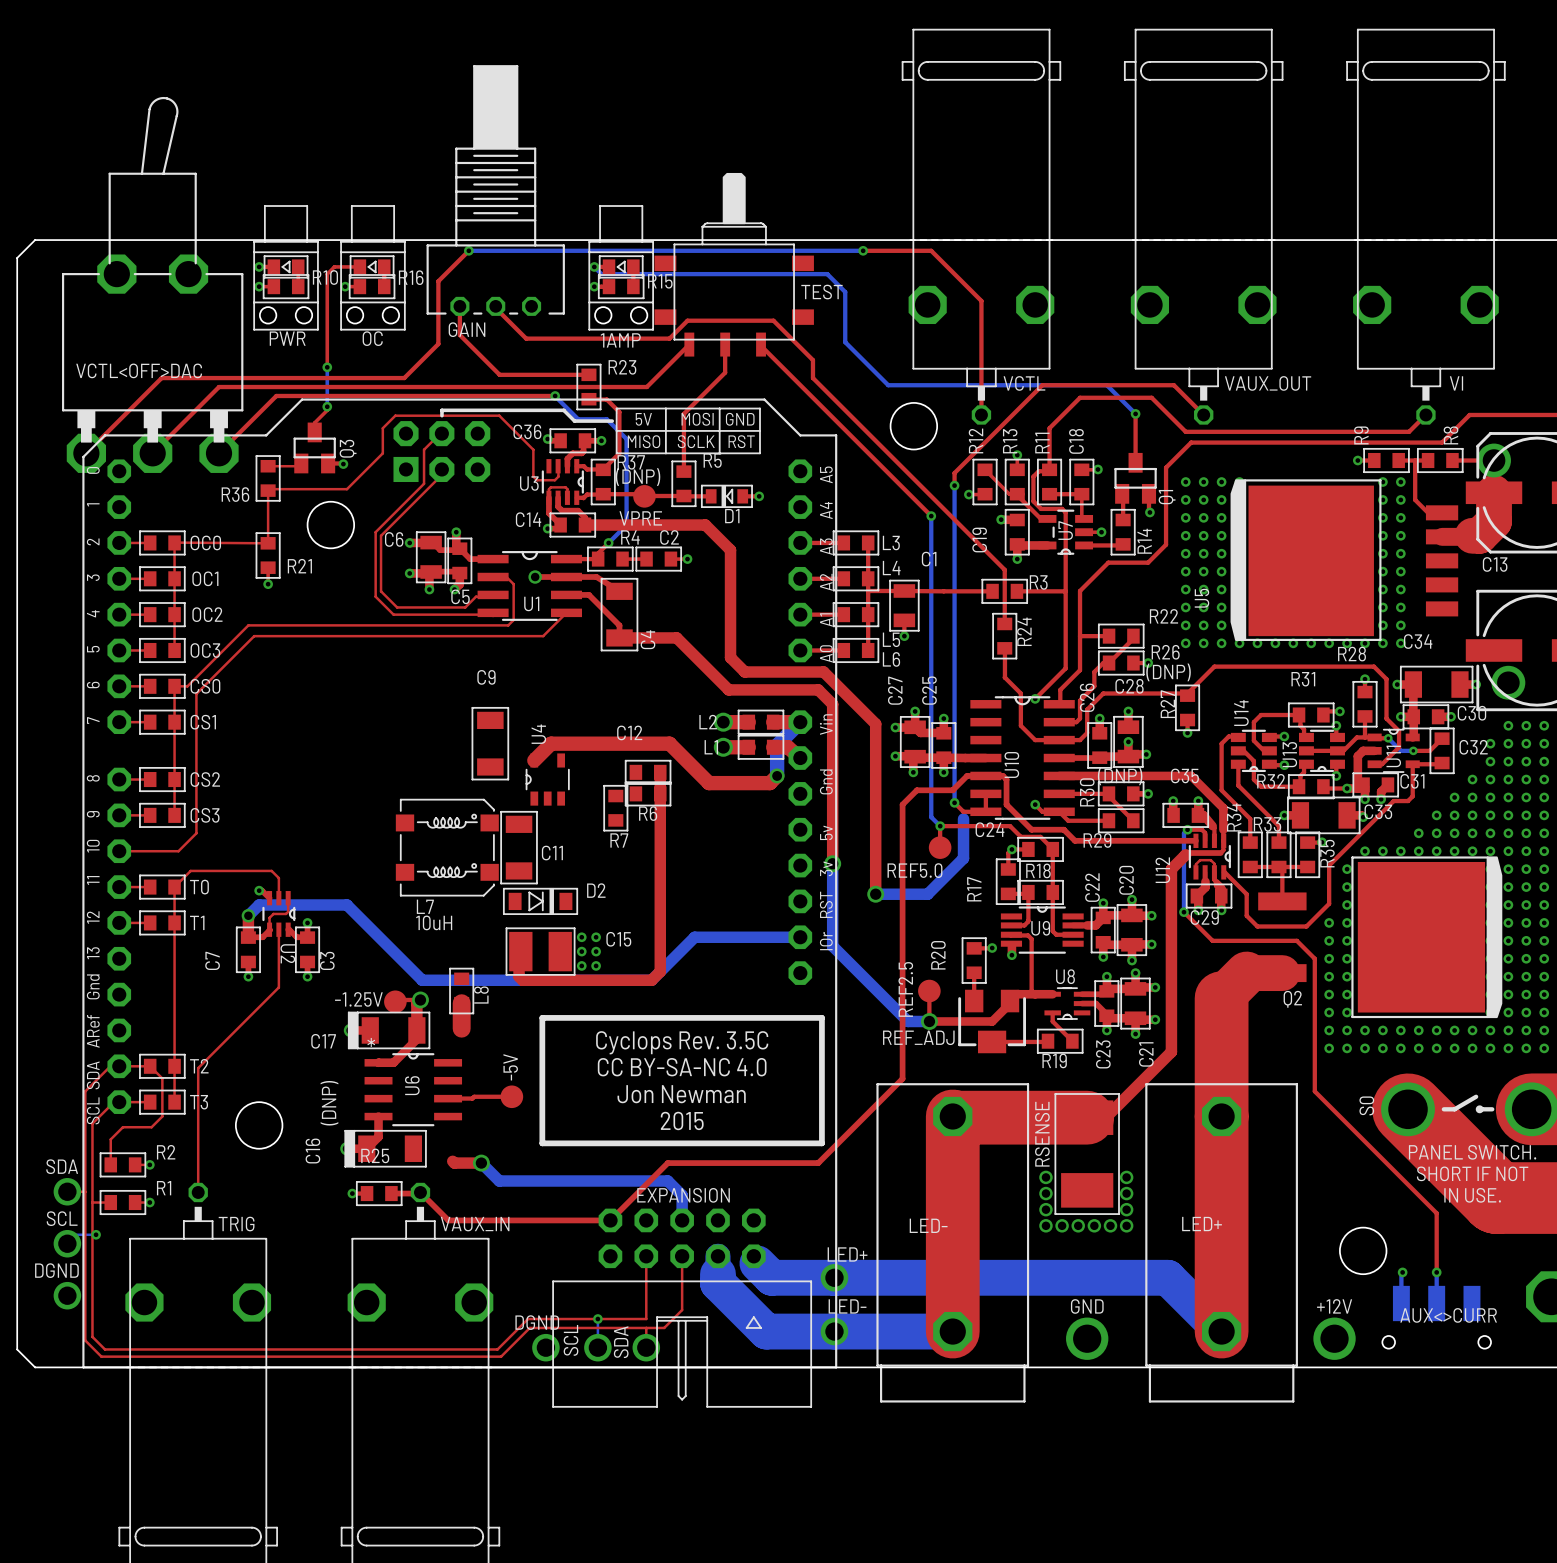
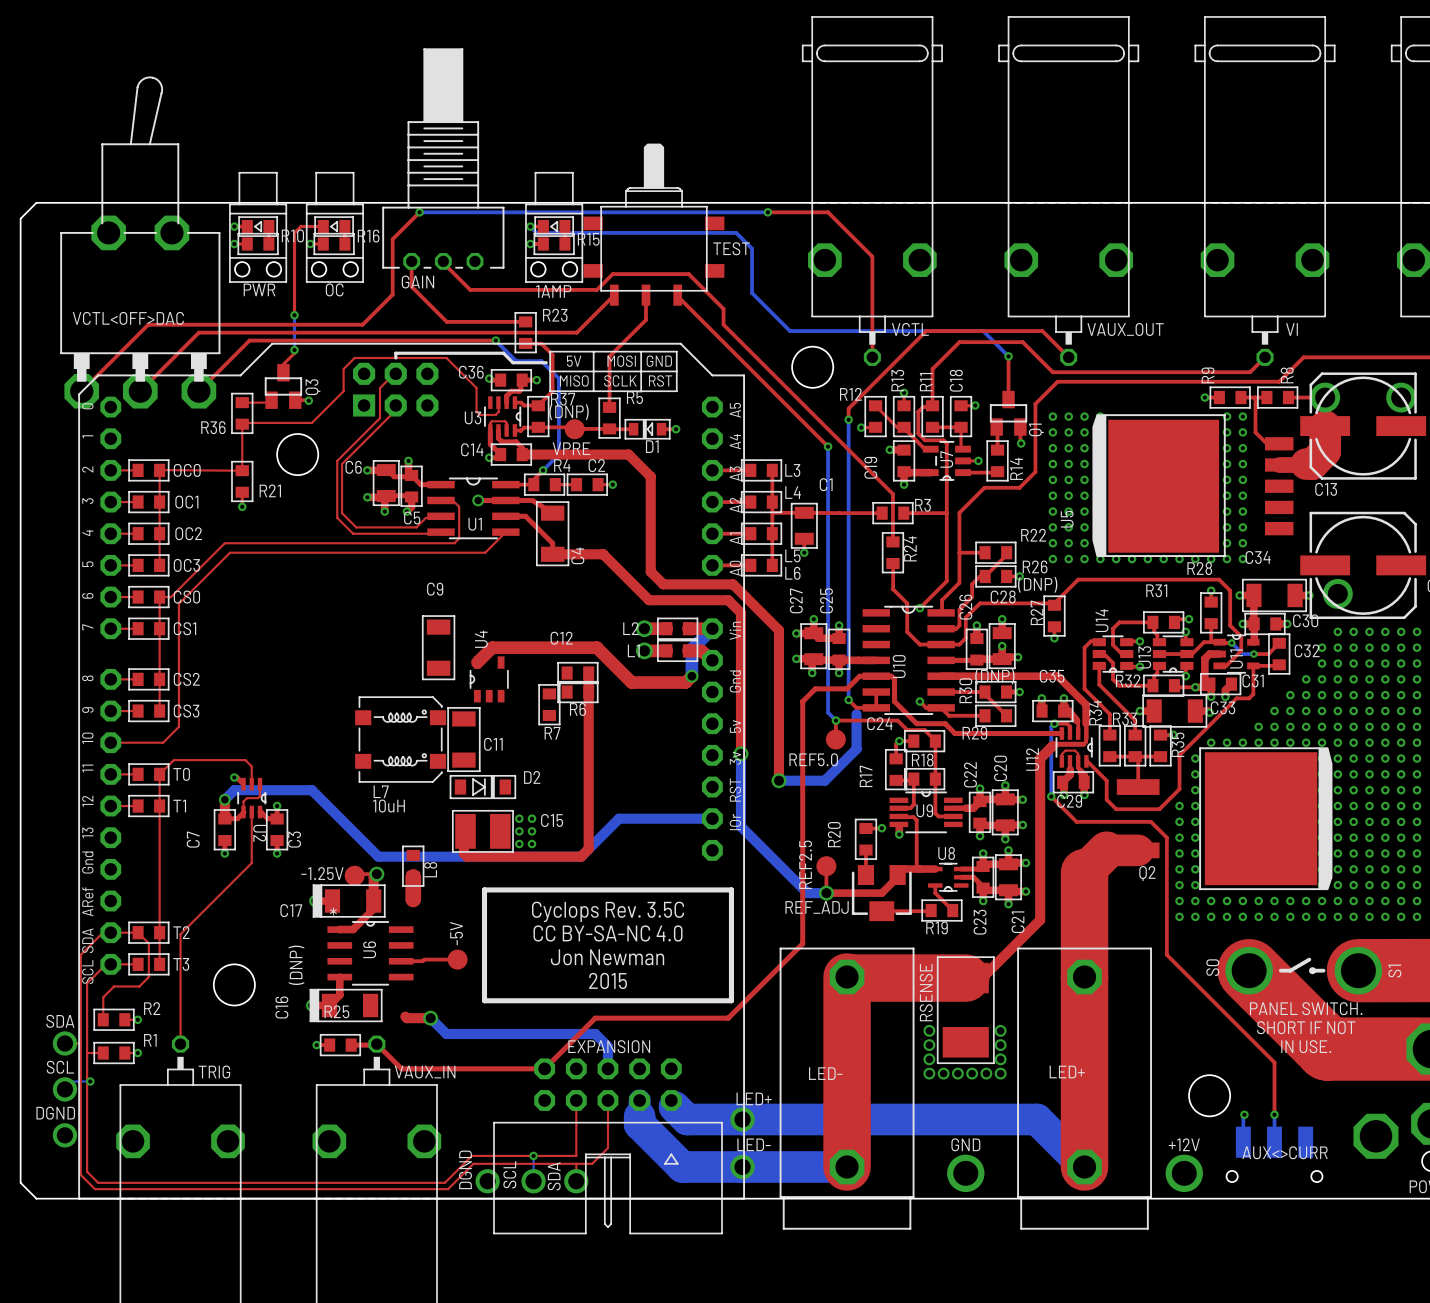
R12 name rotation: 0° (975, 440) -> 90° clockwise (850, 394)
text rotation: 0° (537, 1322) -> 90° counterclockwise (465, 1169)

